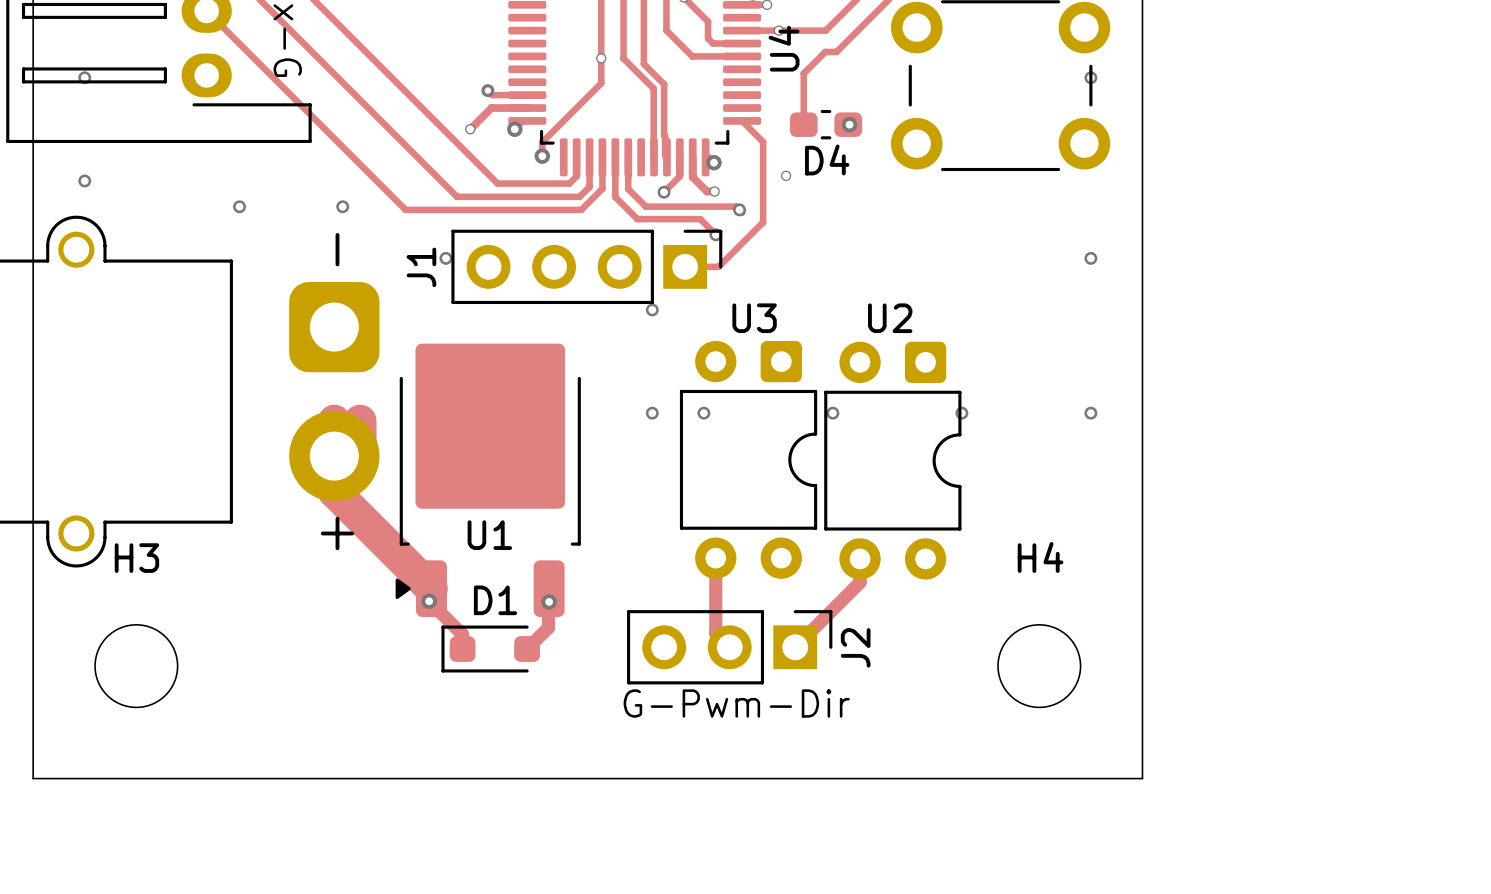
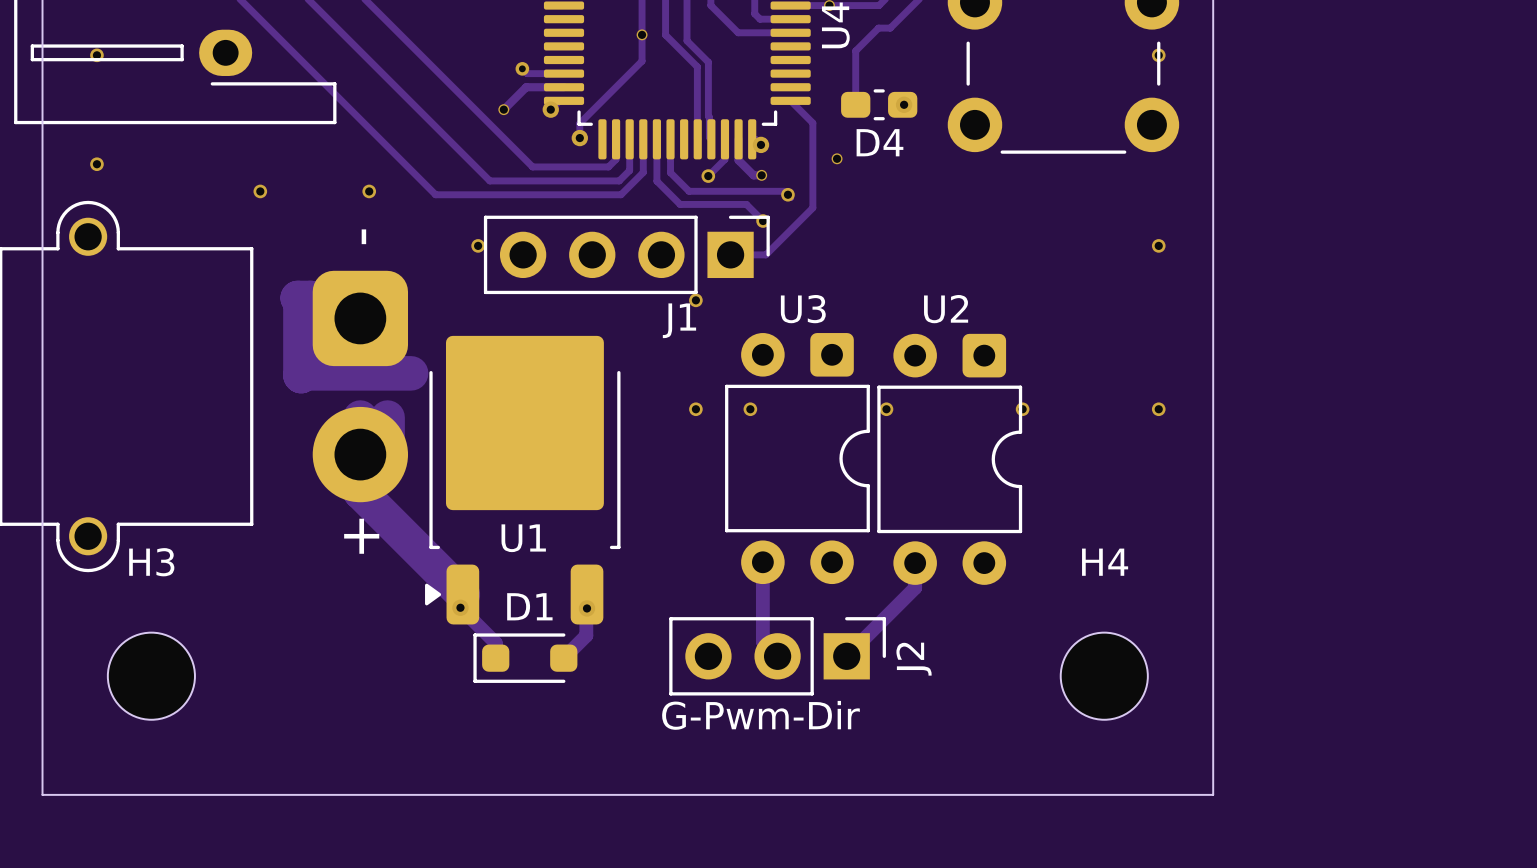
J1 name rotation: 0° (421, 267) -> 90° clockwise (679, 320)
J1 name position: J1 (421, 267) -> J1 (679, 320)
track: none -> (360, 318) (331, 318) (310, 297) (297, 297) (300, 300) (300, 375) (303, 373) (411, 373)

